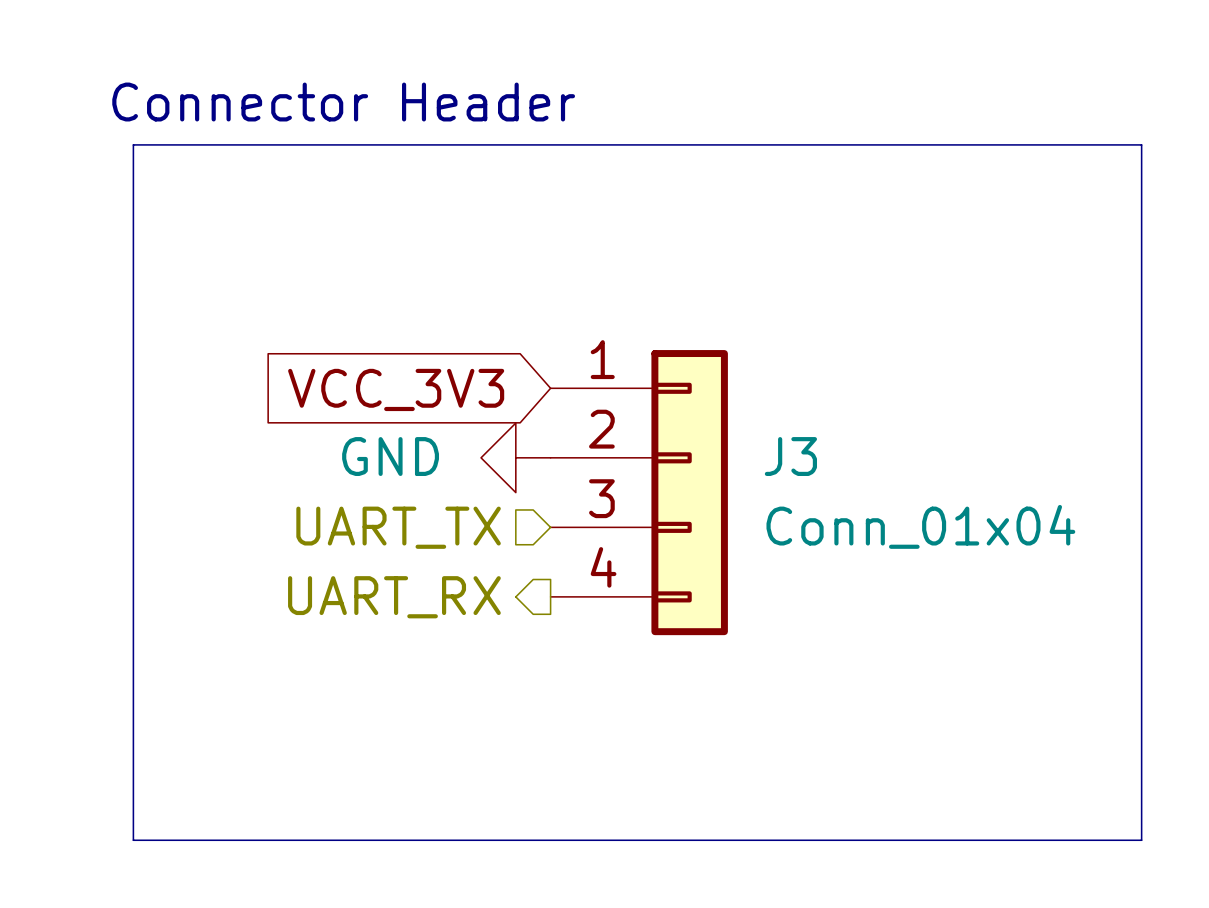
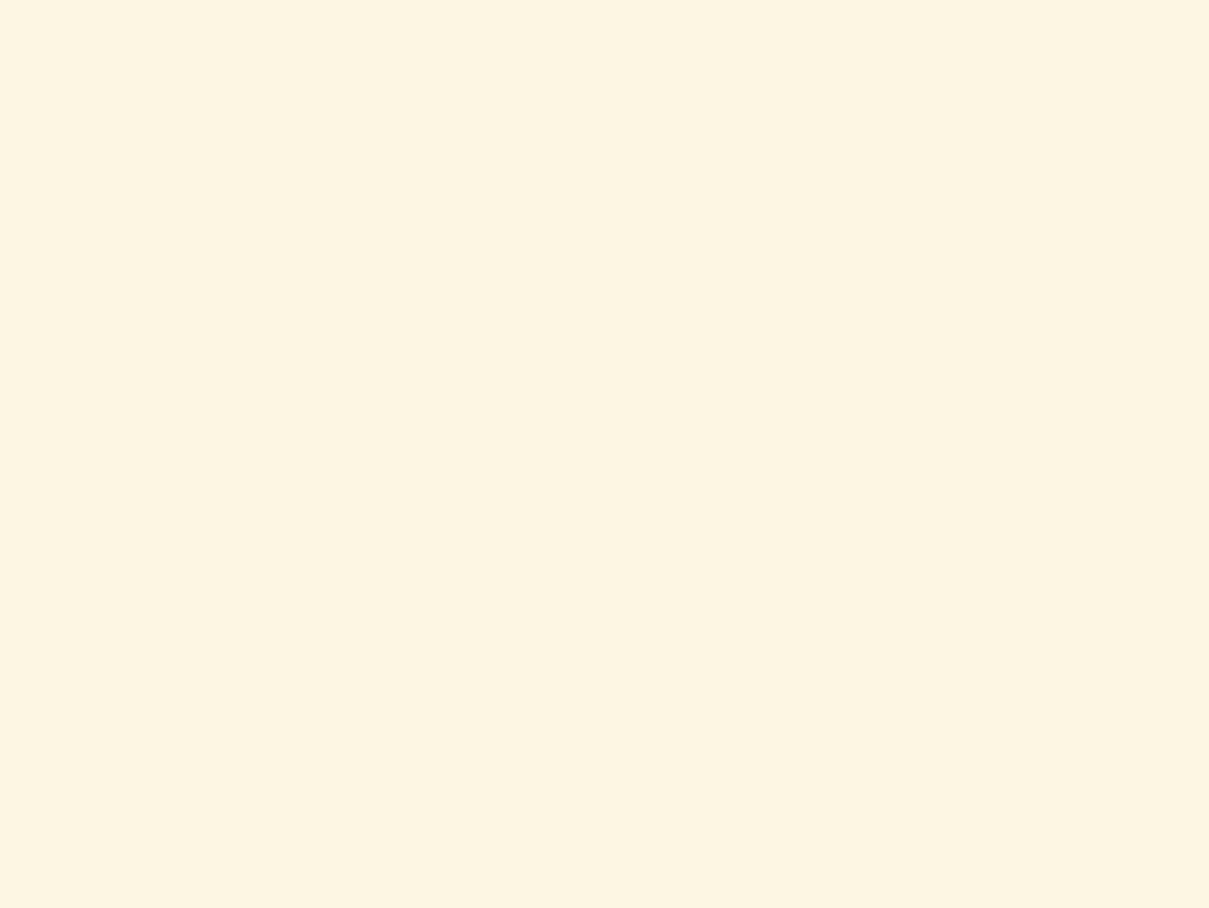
text: Connector Header (343, 102) -> none
line: (133, 144) (1141, 144) (1141, 840) (133, 840) (133, 144) -> none
global label: VCC_3V3 (396, 389) -> none
power symbol: GND (515, 457) -> none
J3: Conn_01x04 (639, 492) -> none
hierarchical label: UART_TX (398, 527) -> none
hierarchical label: UART_RX (394, 597) -> none

